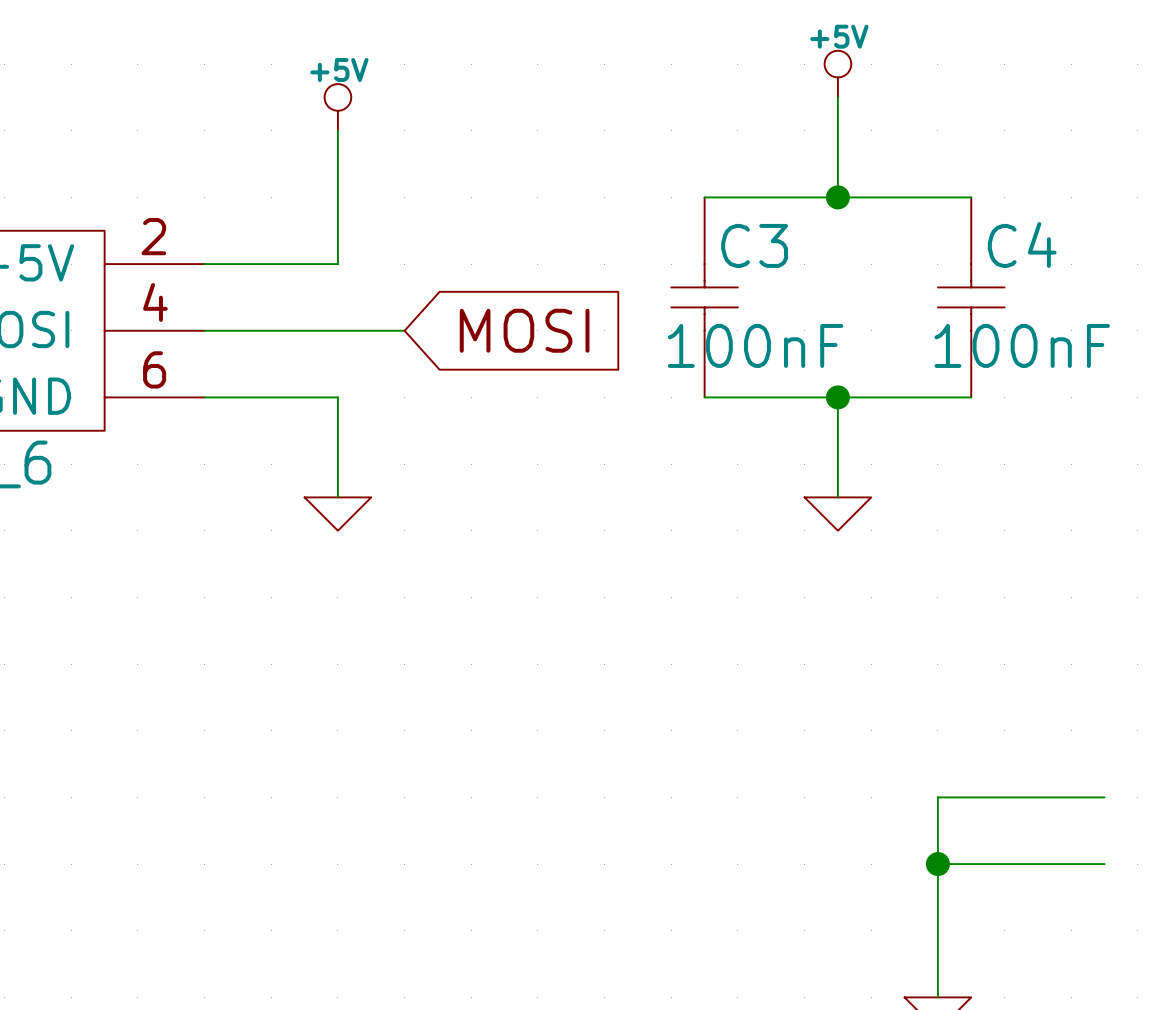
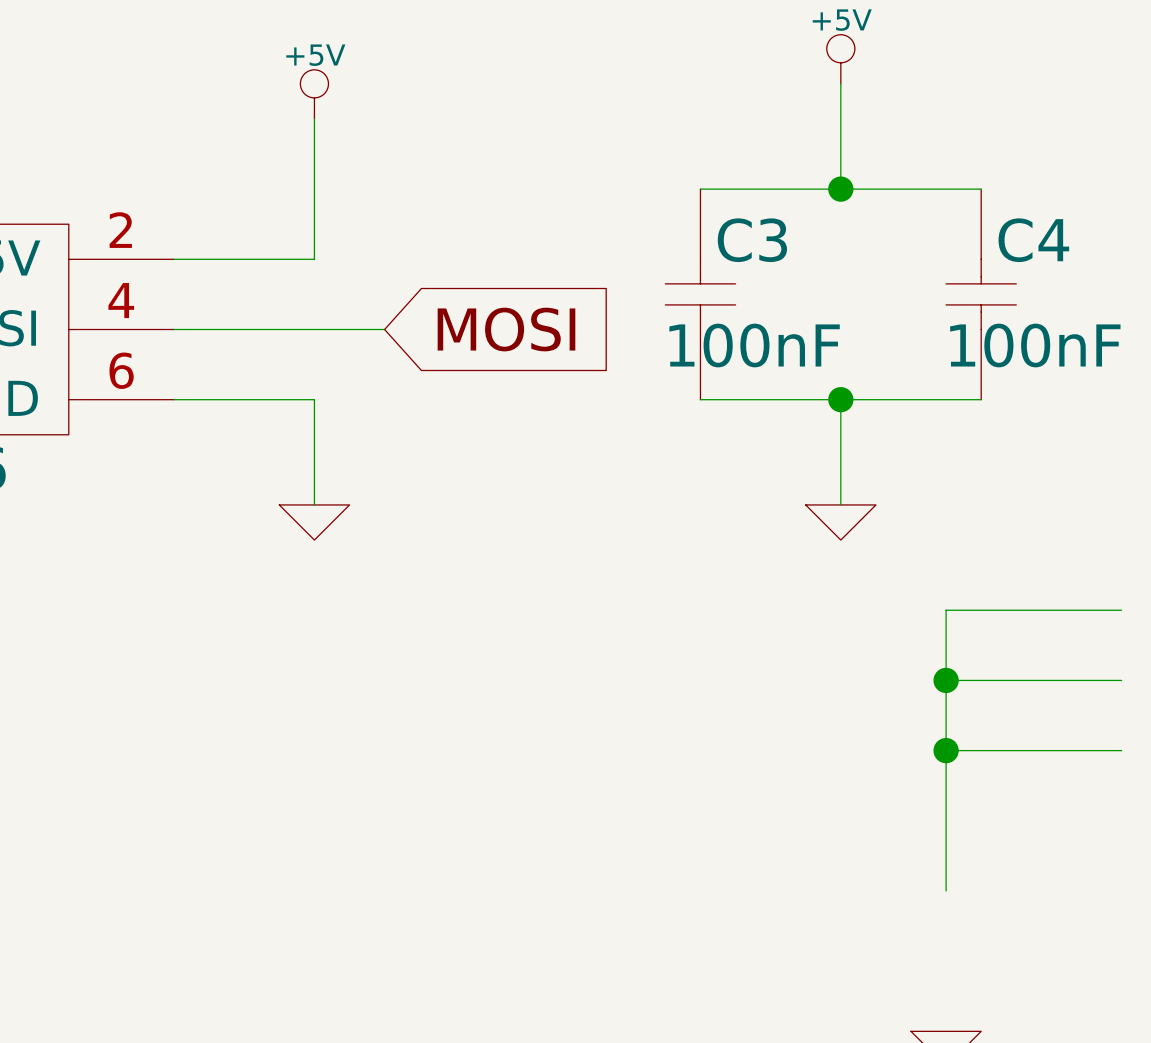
wire: none -> (946, 680) (1121, 680)
junction: none -> (946, 680)
wire: none -> (946, 750) (1121, 750)
junction: none -> (946, 750)
wire: (937, 797) (1104, 797) -> (946, 820) (946, 610) (1121, 610)
junction: (937, 864) -> none
wire: (1104, 864) (937, 864) (937, 997) -> none

